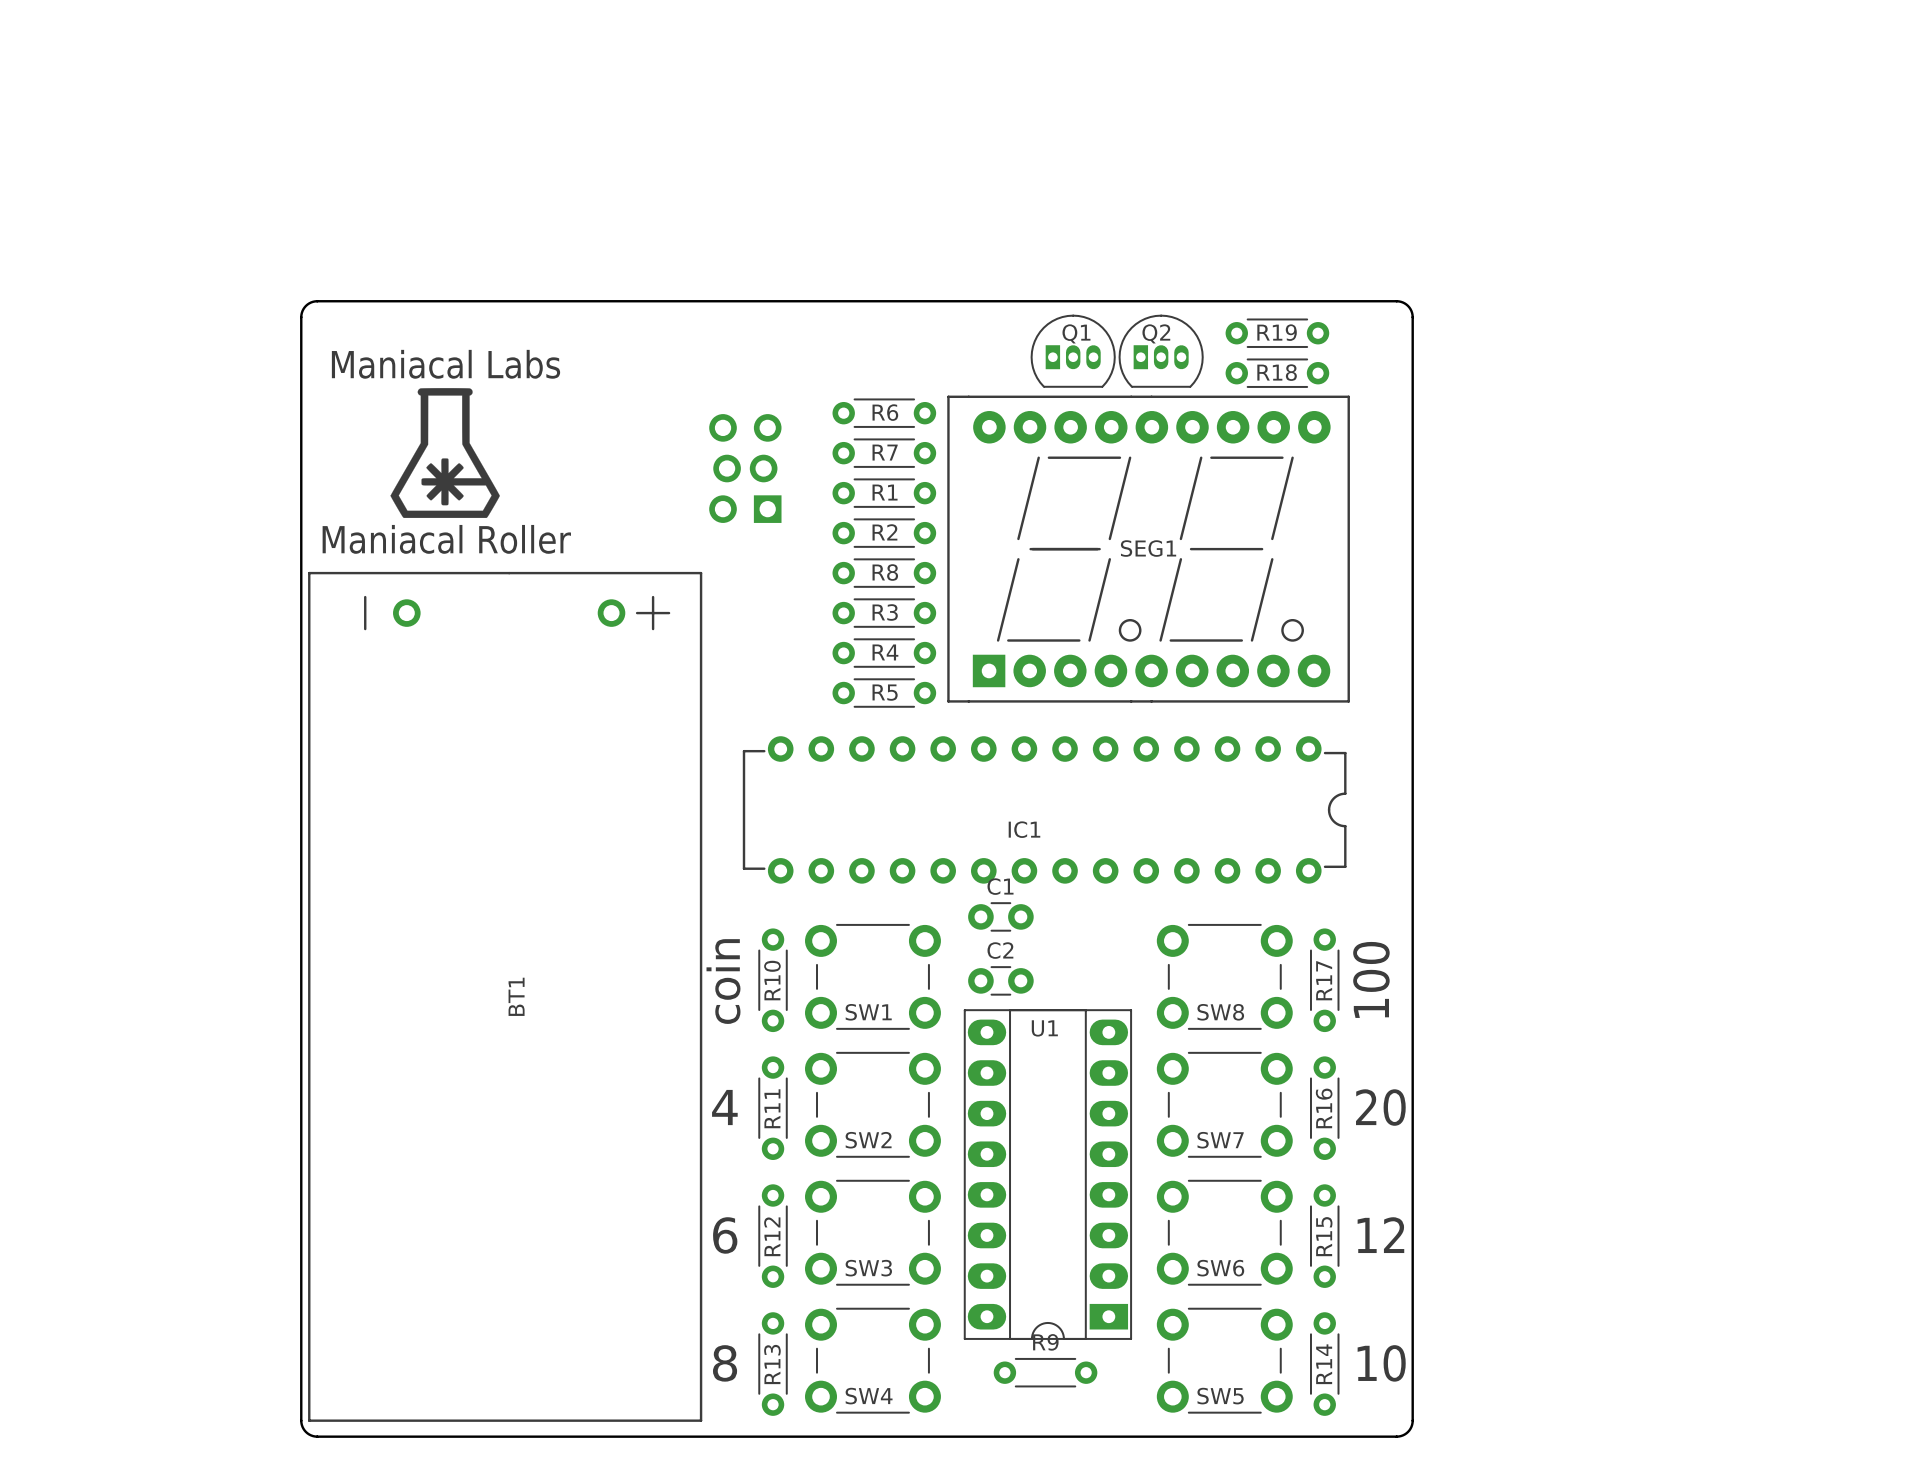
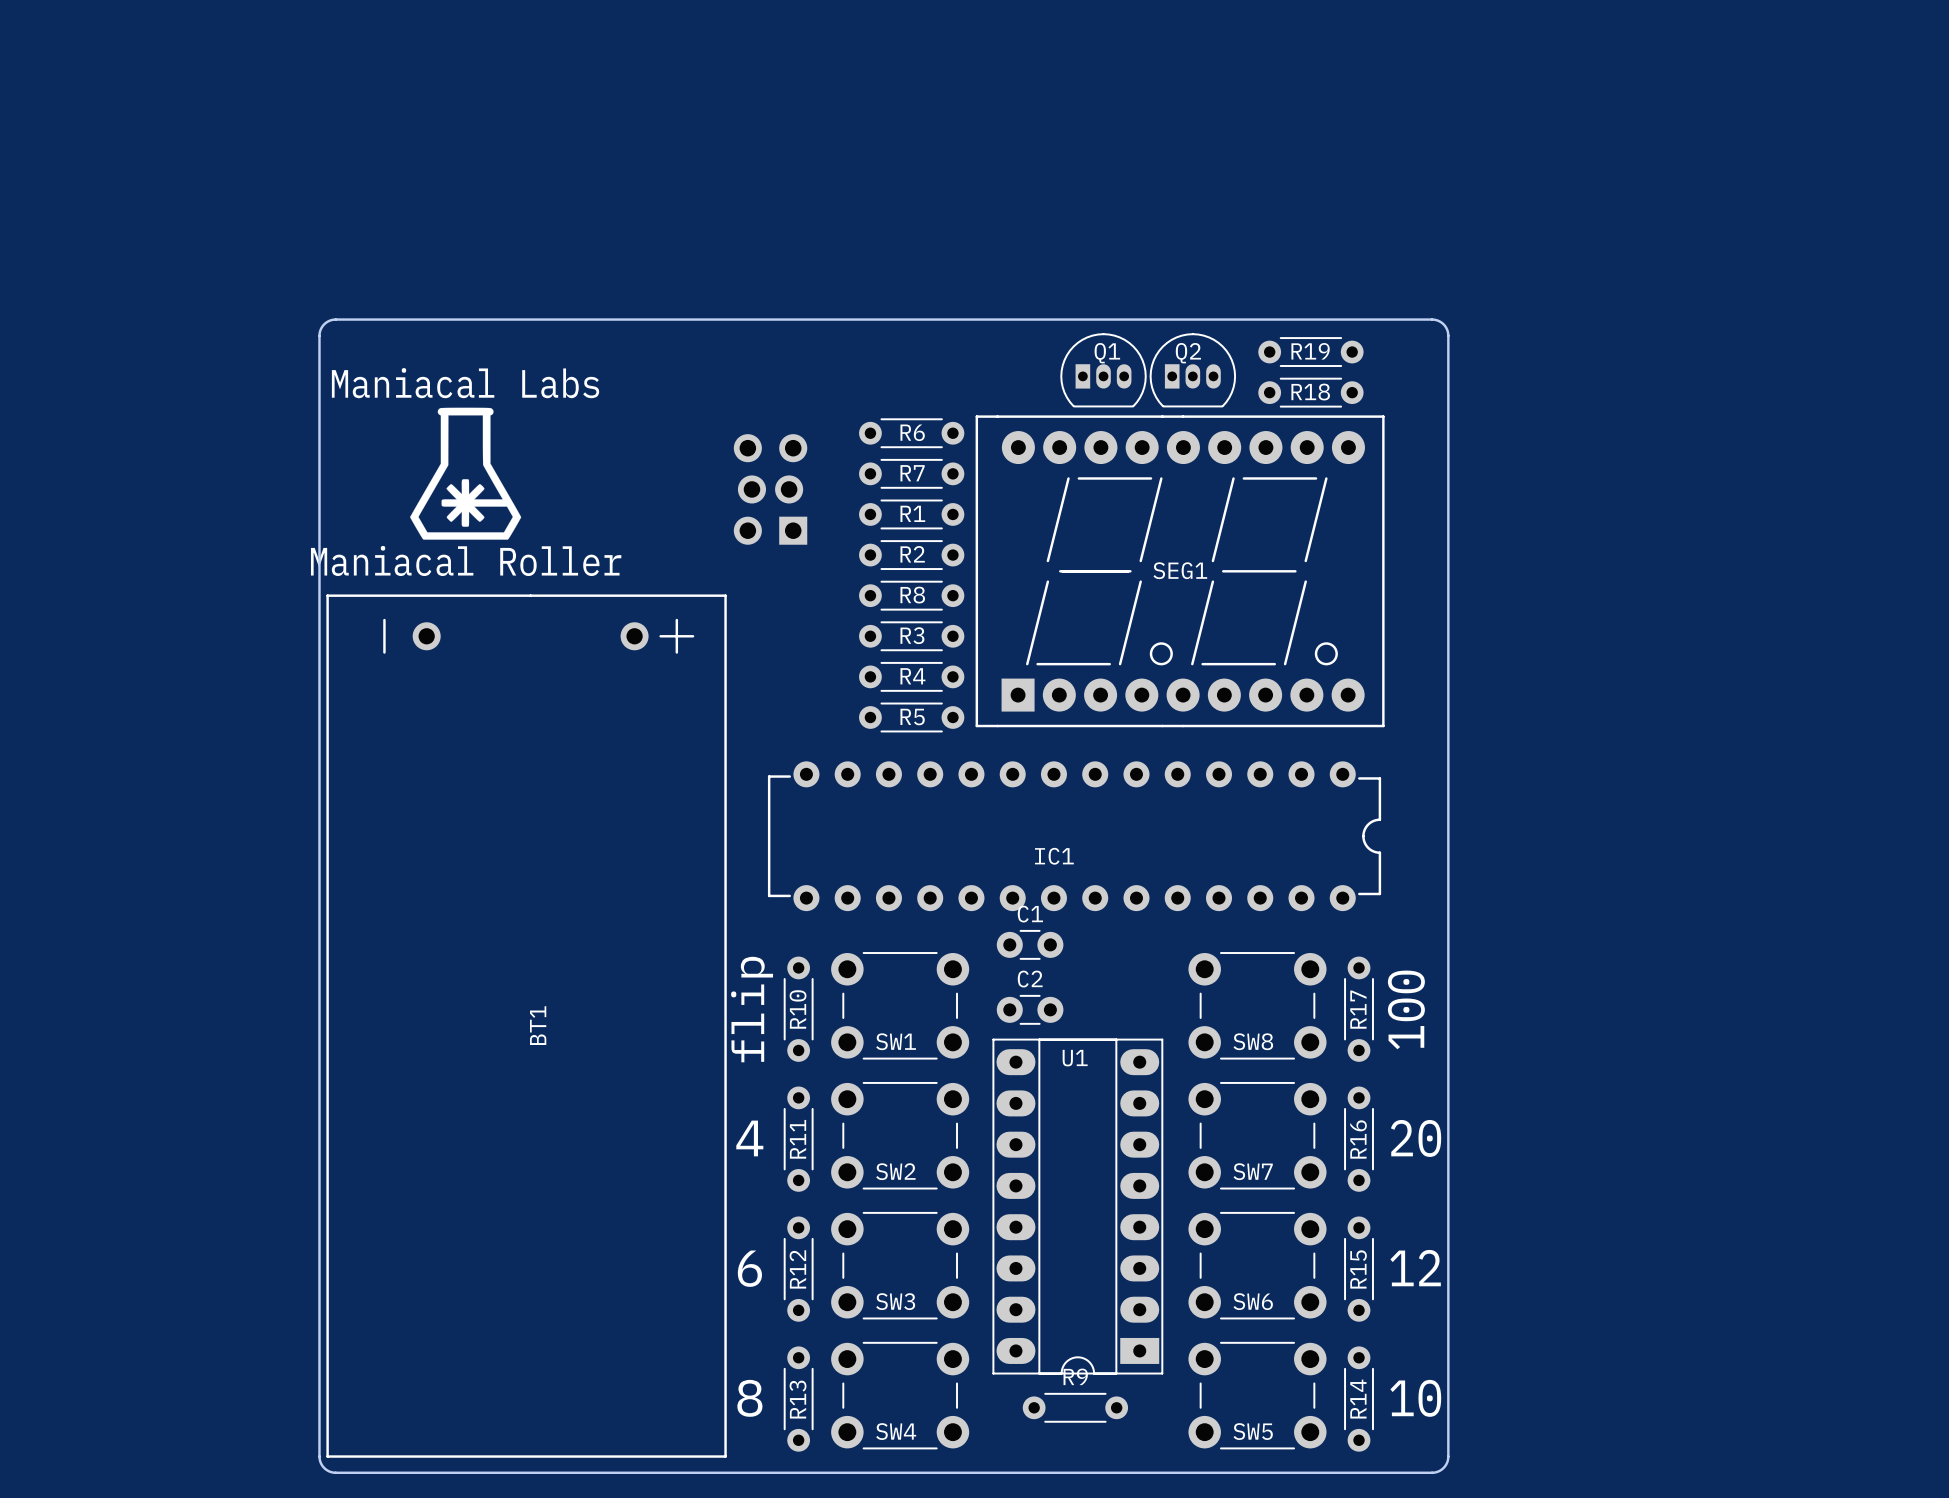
text: coin (723, 981) -> flip (752, 1009)

